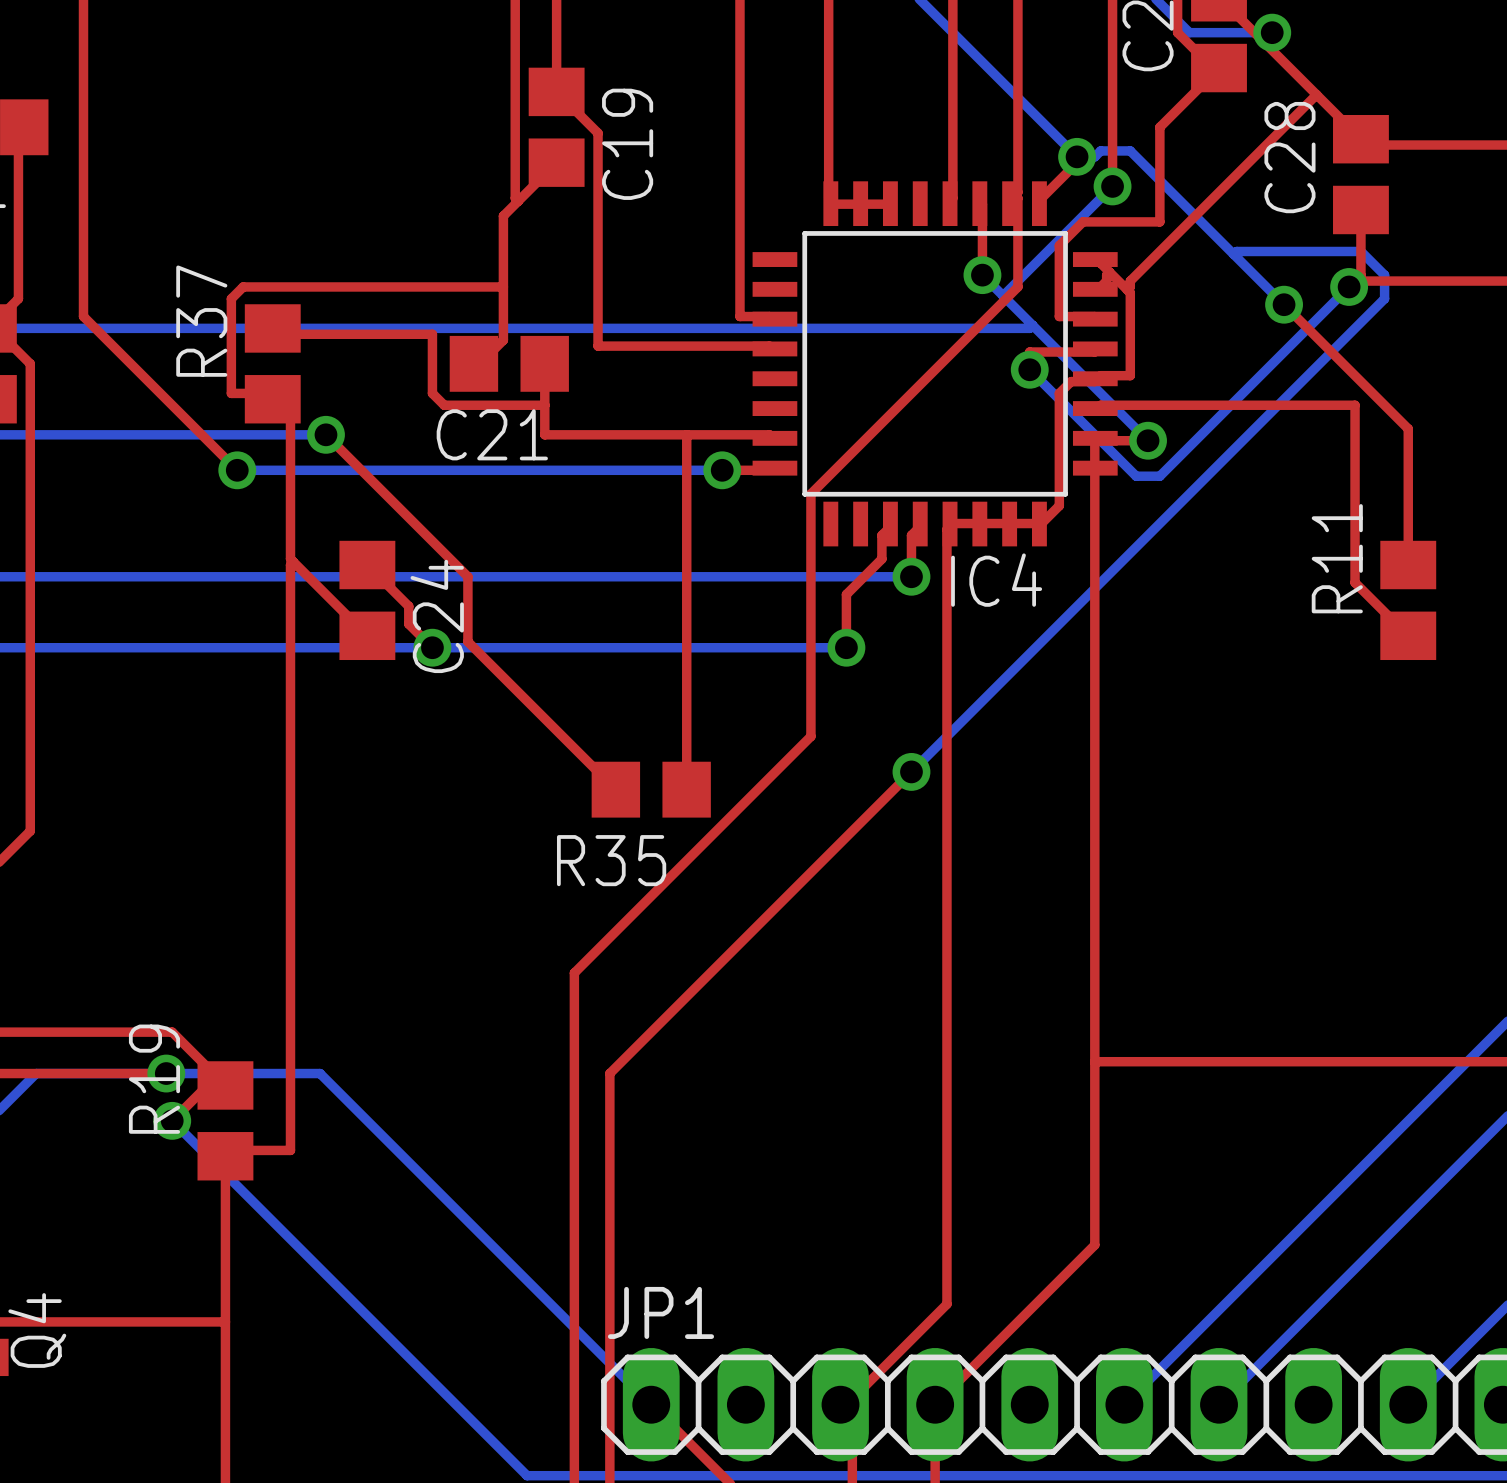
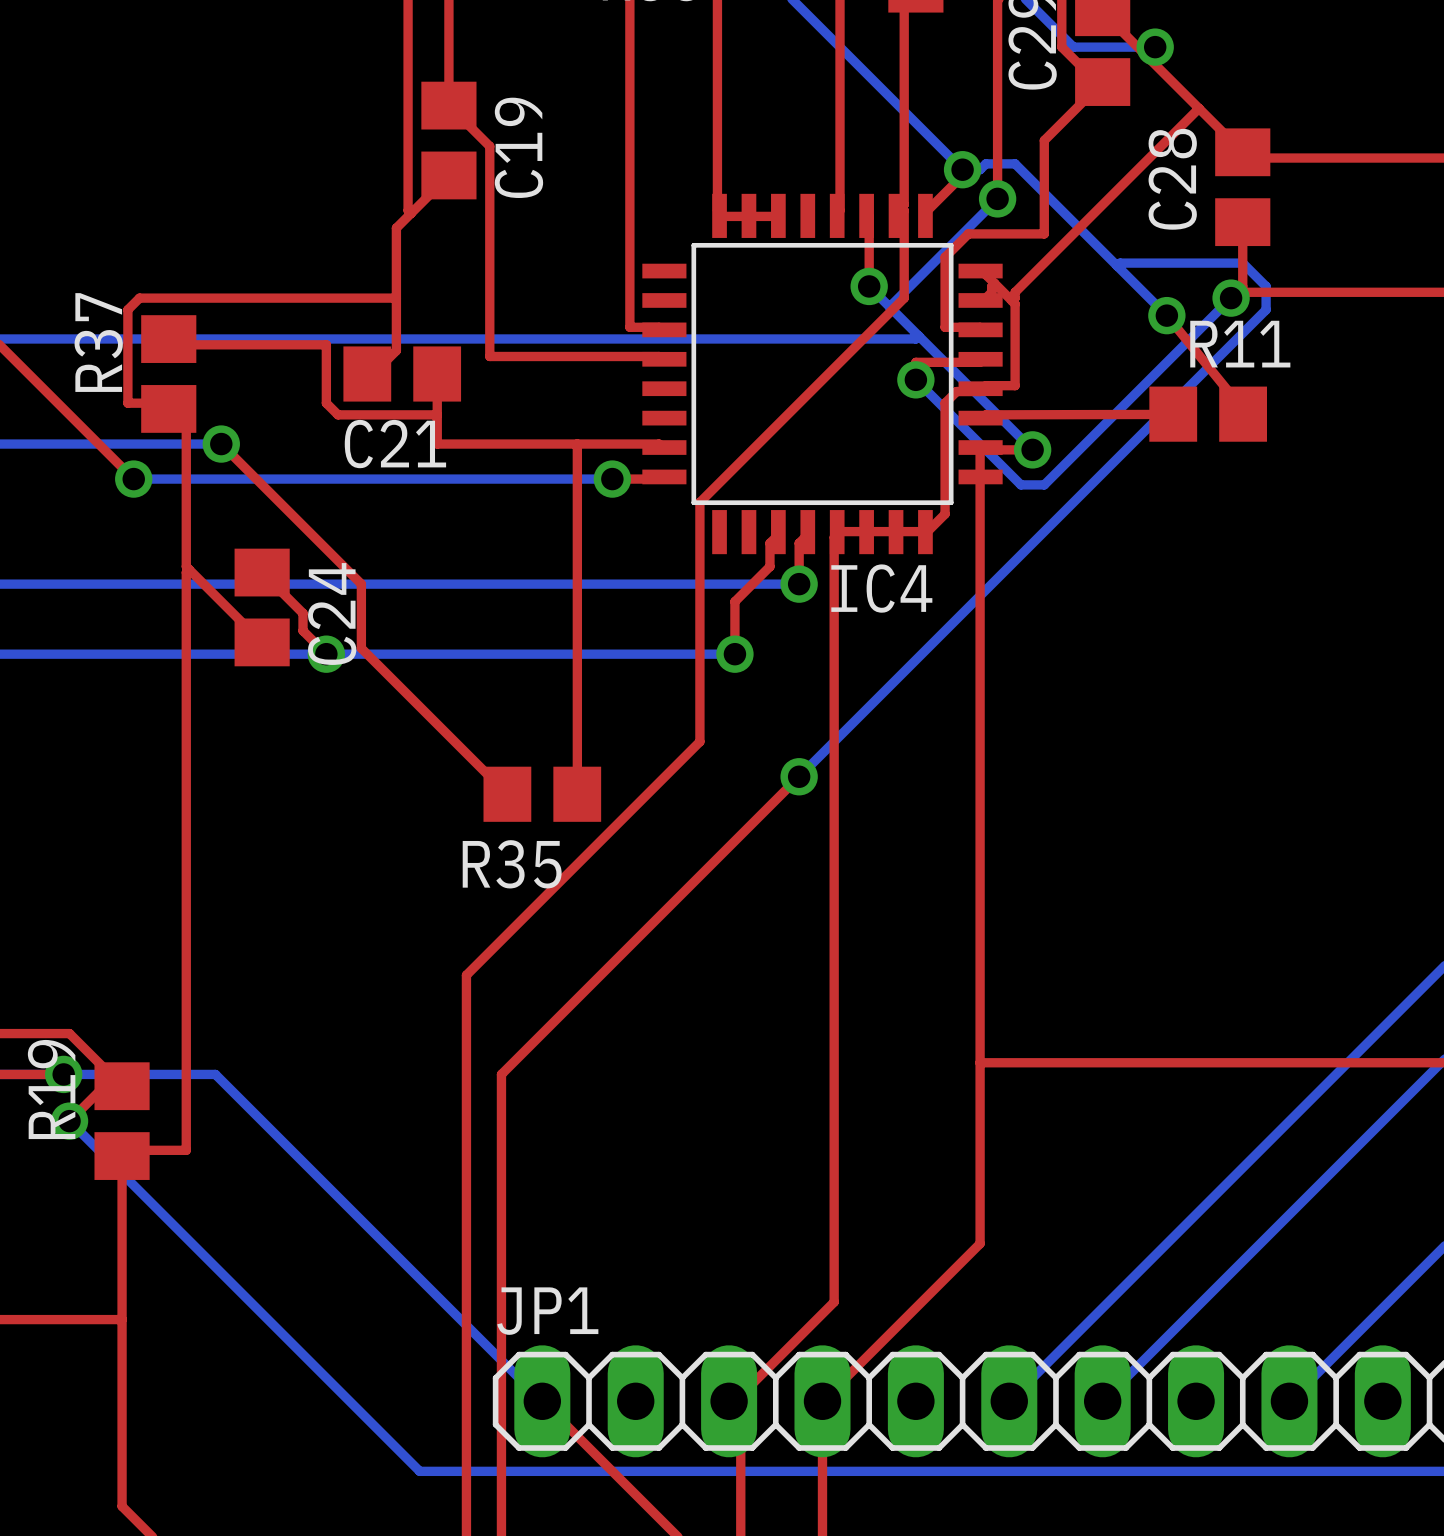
top track: (1284, 304) (1408, 428) (1408, 565) -> (1166, 315) (1243, 409) (1243, 414)
top track: (1100, 405) (1355, 405) (1355, 582) (1408, 635) -> (985, 414) (1169, 414) (1171, 416) (1171, 419) (1173, 414)
R11 rotation: 0° (1408, 600) -> 90° clockwise (1208, 414)
R11 position: (1408, 600) -> (1208, 414)

